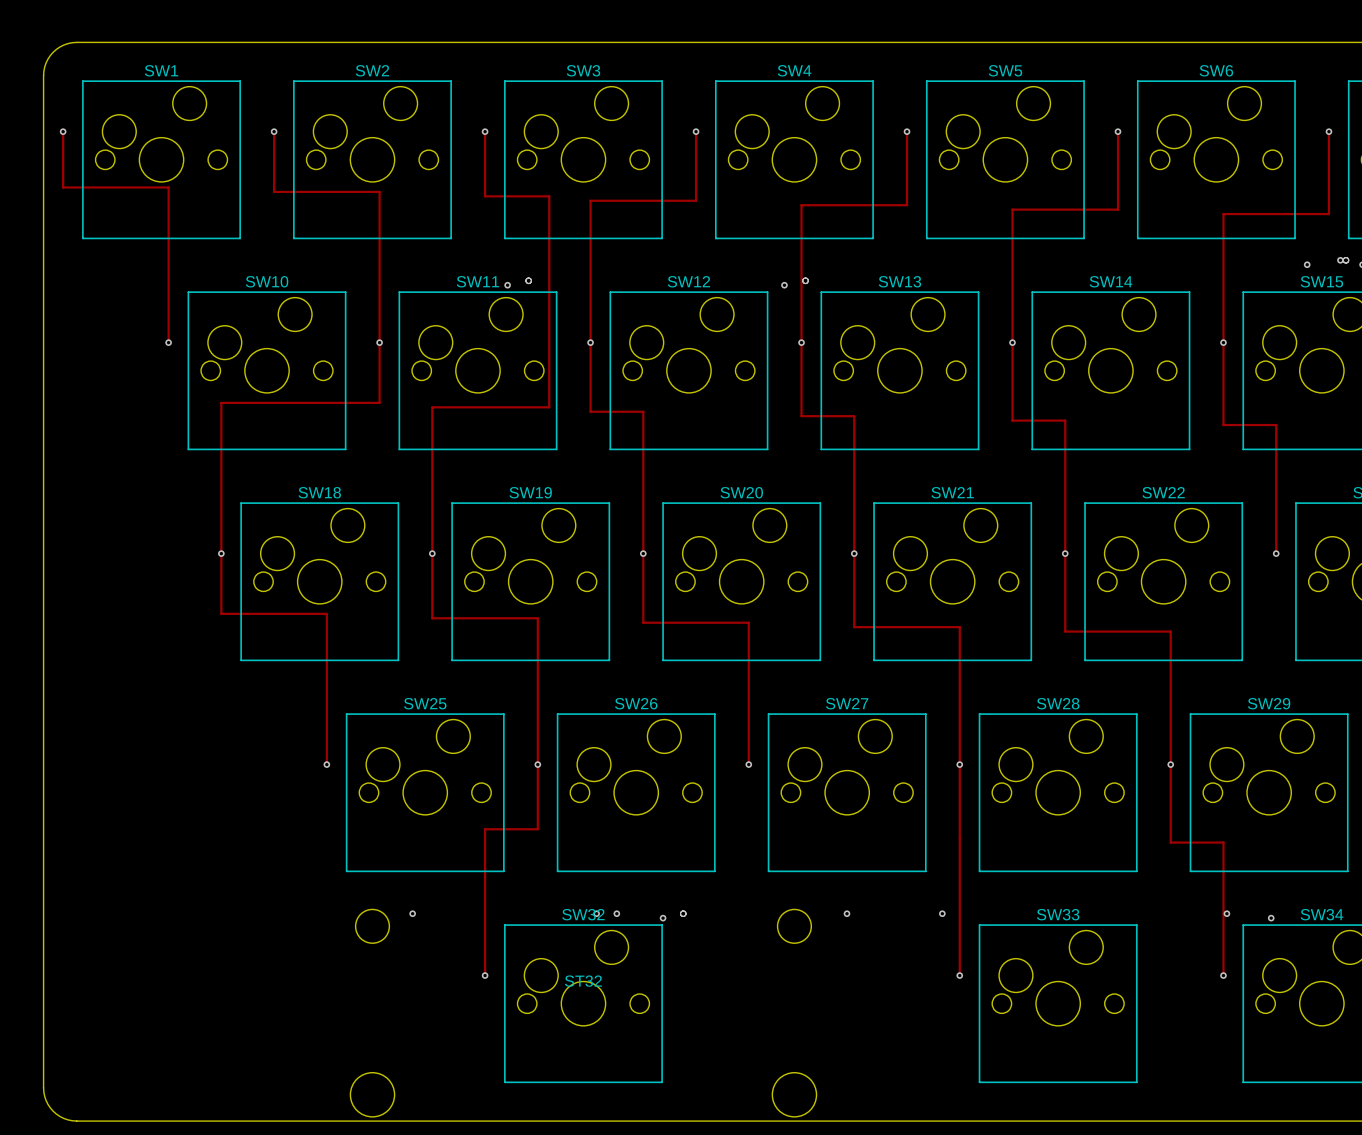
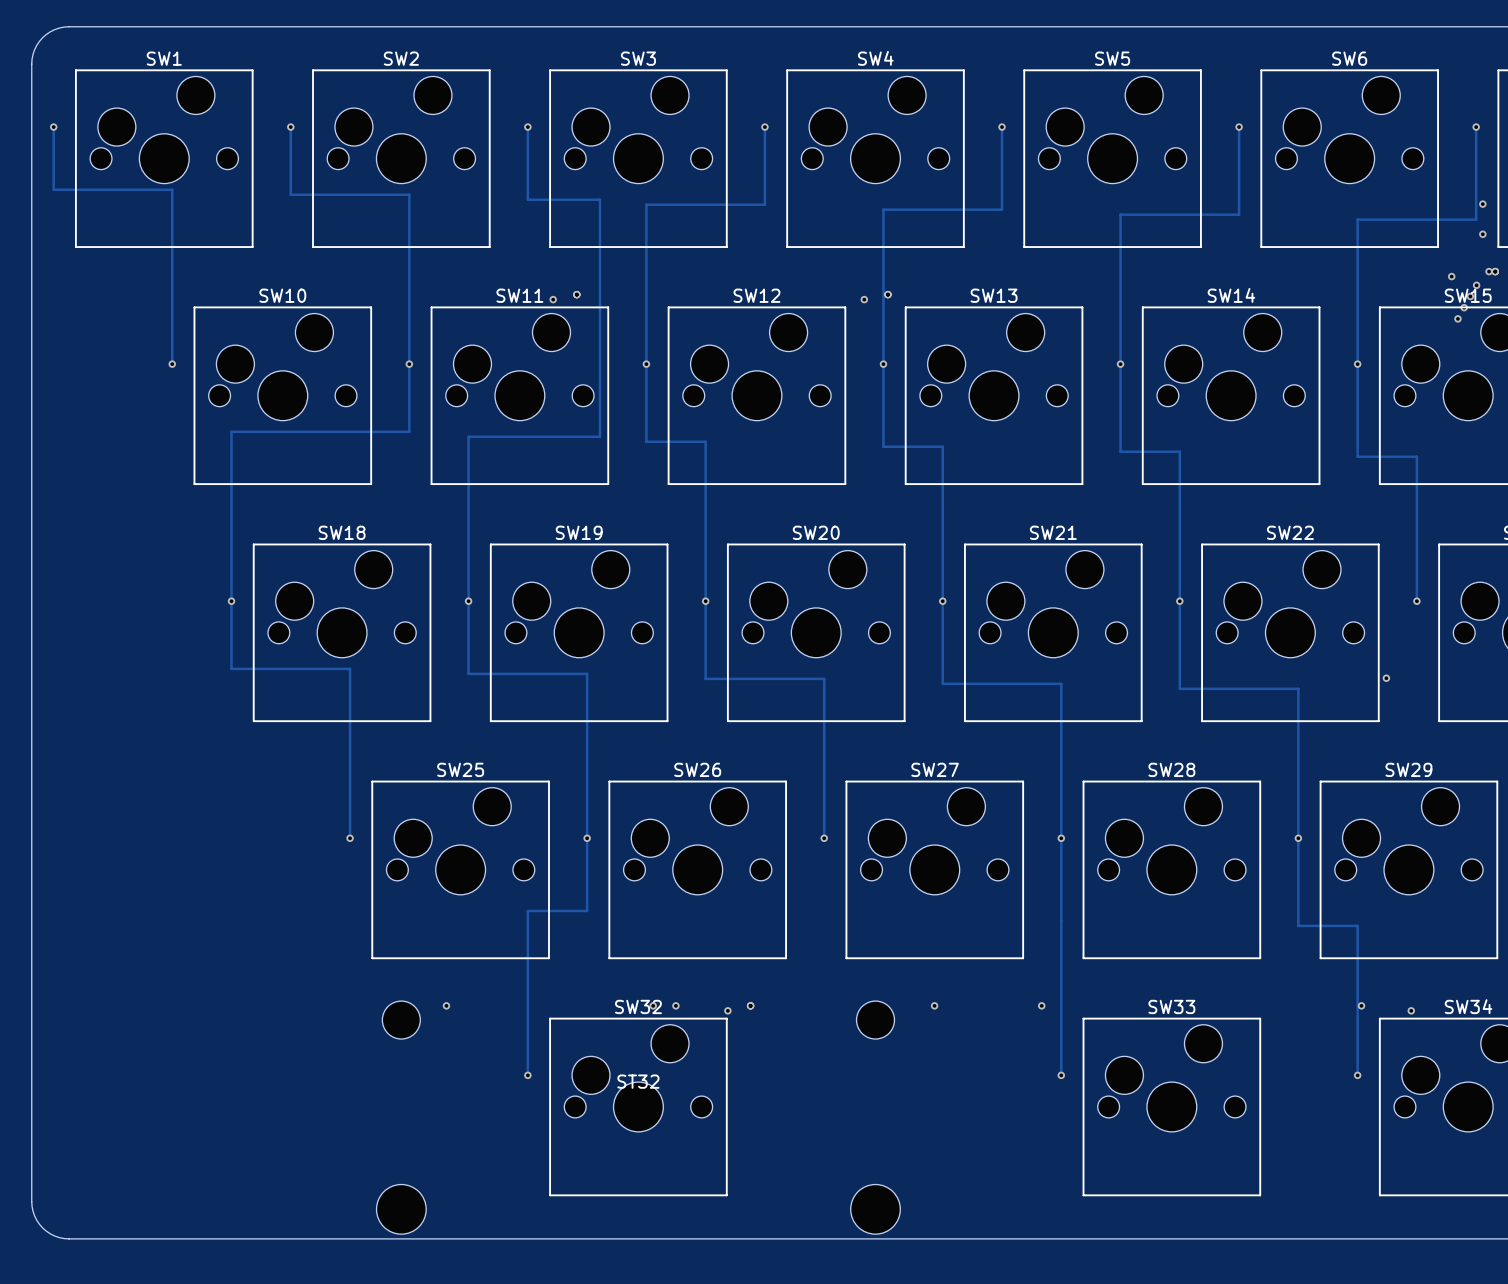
via: none -> (1482, 204)
via: none -> (1482, 234)
via: none -> (1476, 285)
via: none -> (1470, 296)
via: none -> (1464, 307)
via: none -> (1457, 318)
via: none -> (1386, 678)

